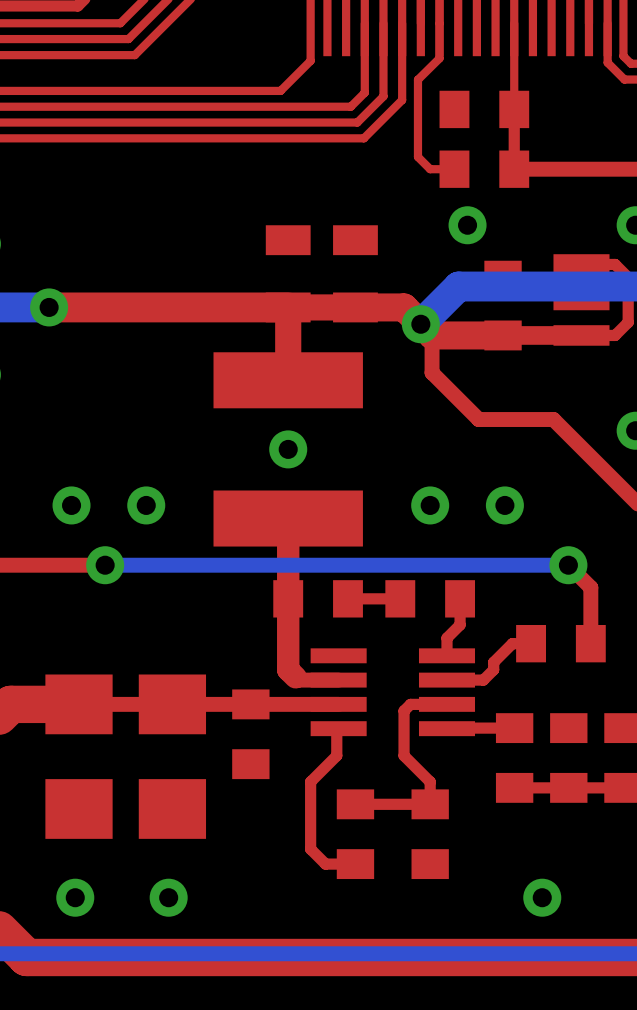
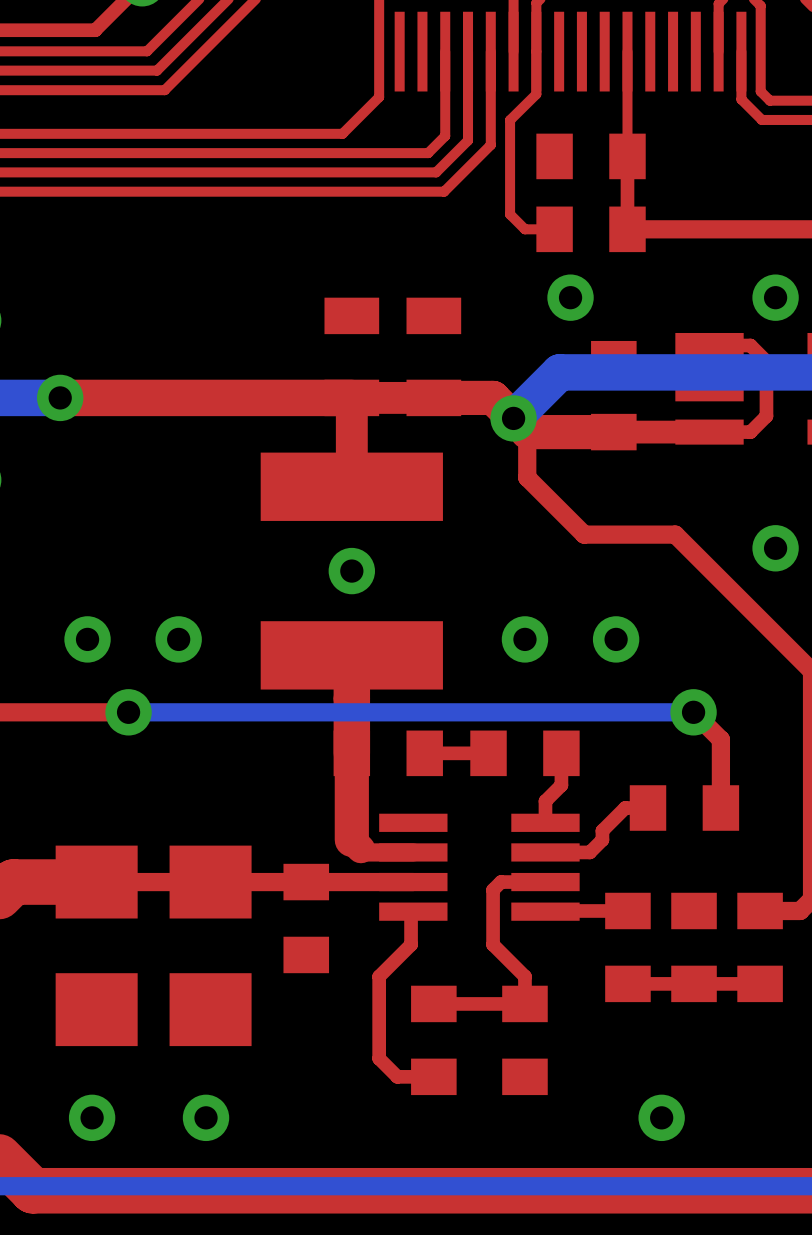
top track width: thin (288, 518) (288, 669) (295, 677) -> thick (351, 655) (351, 839) (360, 849)

